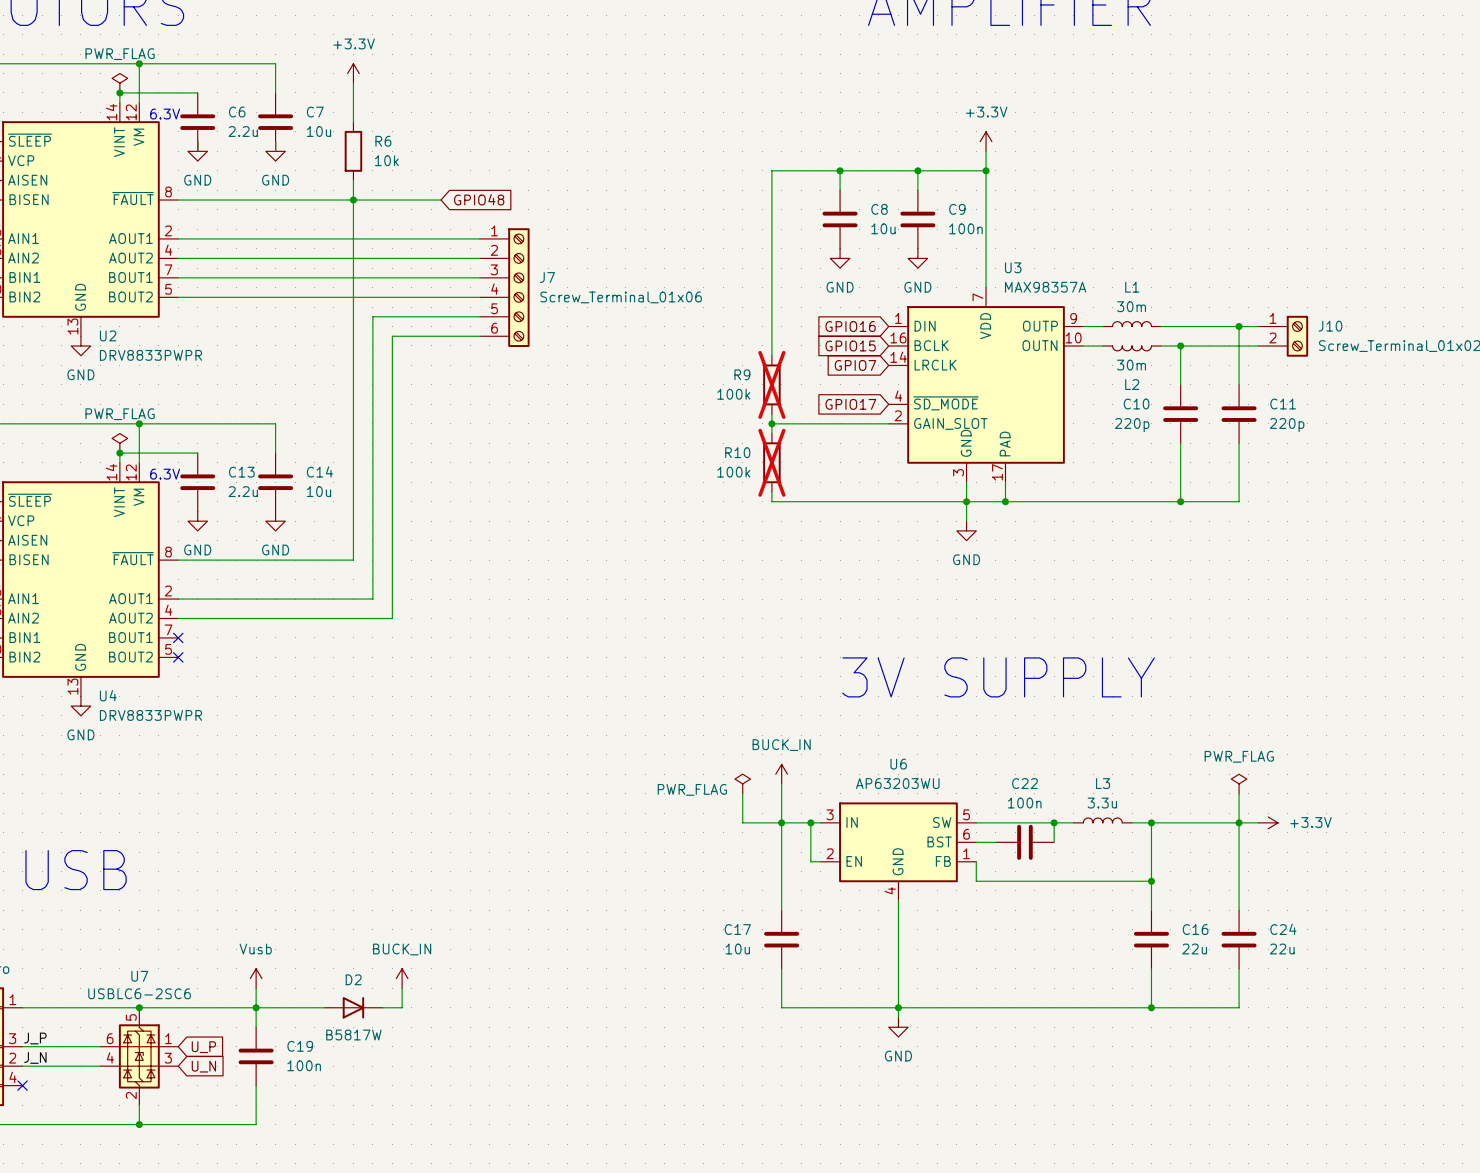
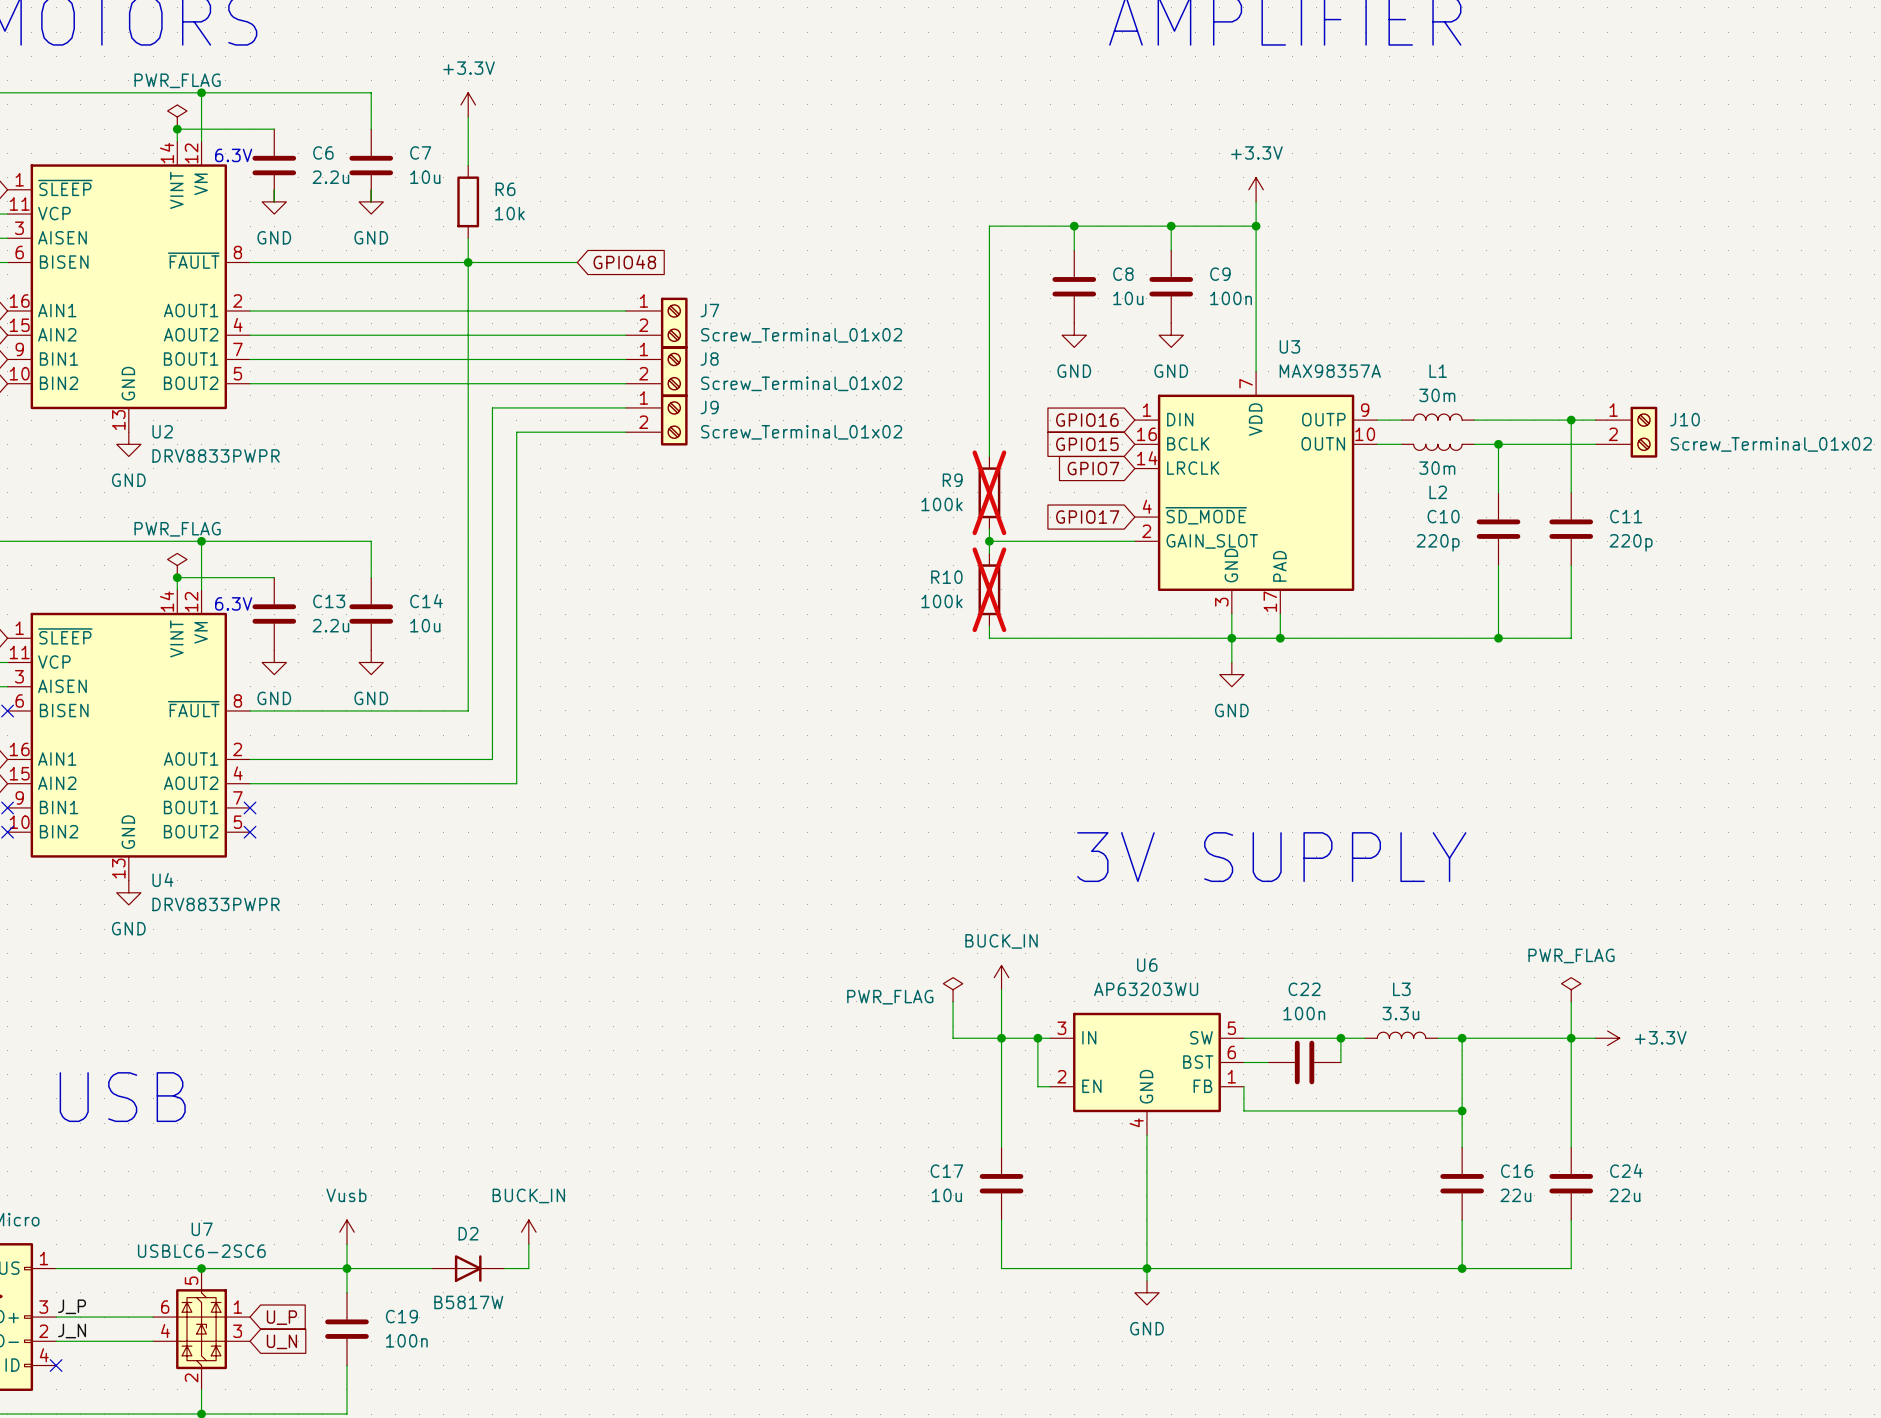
J7 symbol: [479, 228, 530, 347] -> [625, 297, 688, 349]
J8: none -> Screw_Terminal_01x02 (656, 371)
J7 value: Screw_Terminal_01x06 (621, 297) -> Screw_Terminal_01x02 (801, 335)
J9: none -> Screw_Terminal_01x02 (656, 420)

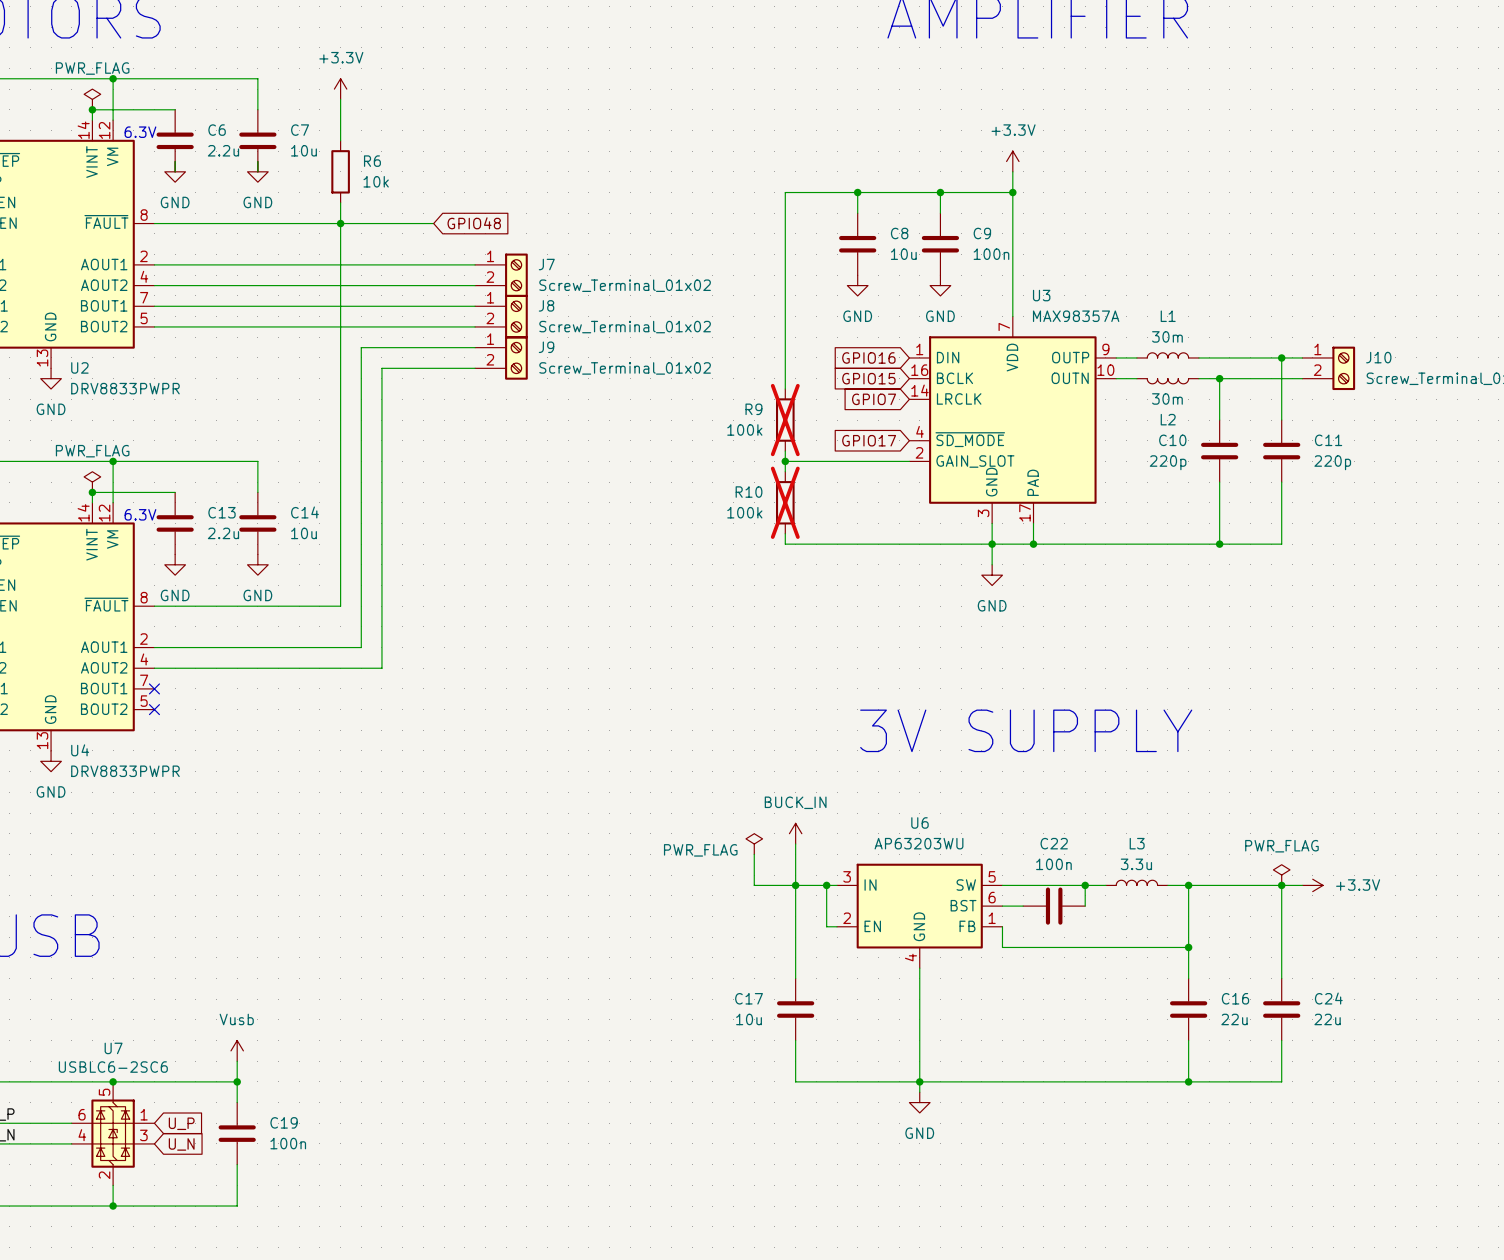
power symbol position: PWR_FLAG (1571, 989) -> PWR_FLAG (1281, 875)
wire: (1571, 1001) (1571, 1038) -> none
power symbol: BUCK_IN (528, 1232) -> none
wire: (528, 1244) (528, 1268) (504, 1268) -> none
wire: (346, 1268) (431, 1268) -> none
D2: B5817W (468, 1268) -> none

